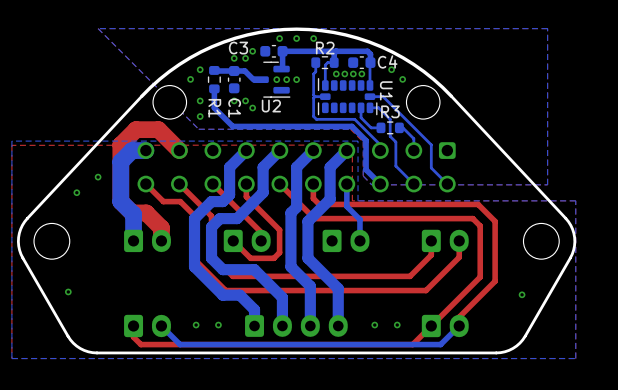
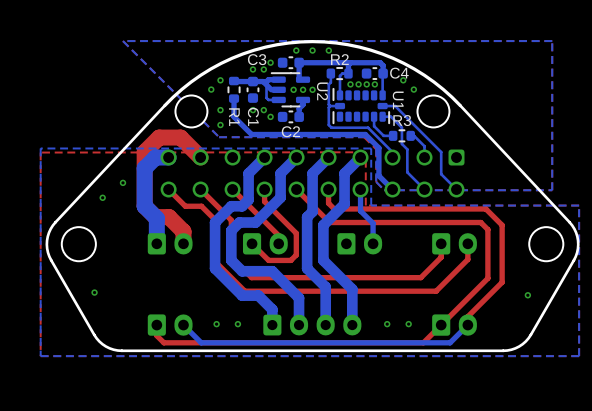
U2 footprint: [252, 61, 291, 98] -> [271, 72, 311, 108]
bottom track: none -> (278, 79) (268, 79) (266, 81) (266, 97) (268, 99) (278, 99)
bottom track: none -> (303, 99) (303, 104) (299, 108) (299, 116)
U2 name rotation: 0° (271, 106) -> 90° clockwise (322, 91)
U2 name position: U2 (271, 106) -> U2 (322, 91)
C2: none -> (290, 116)

